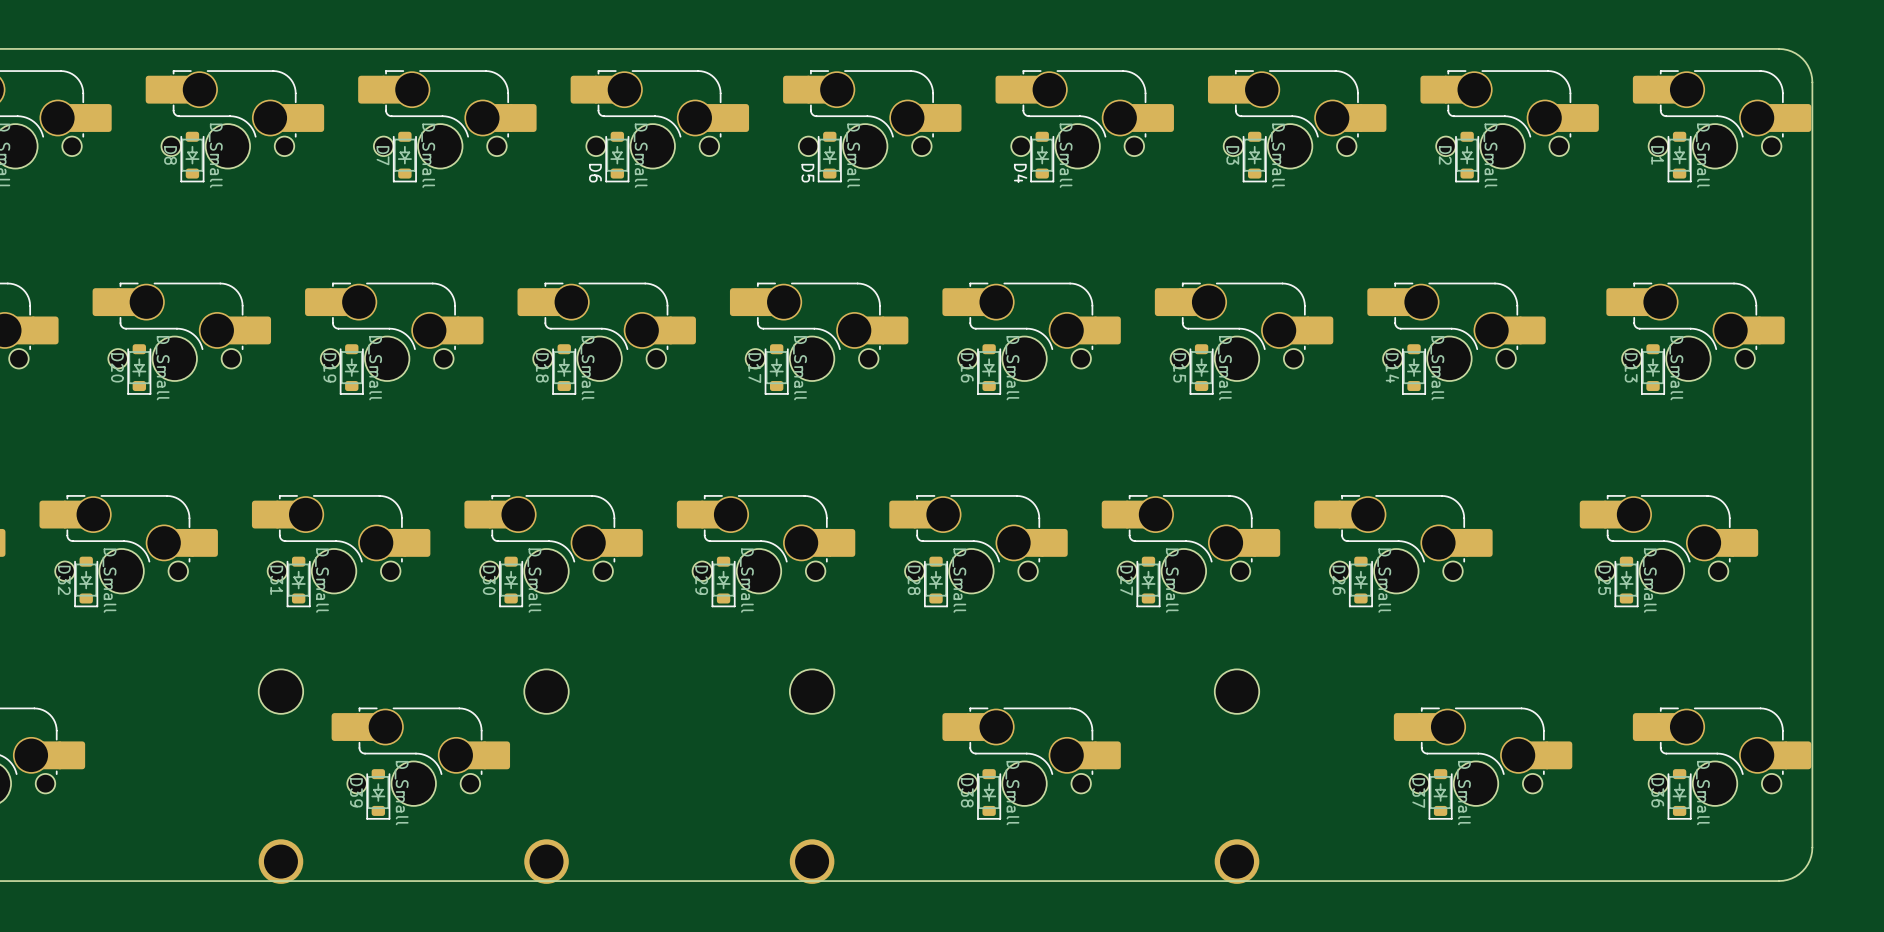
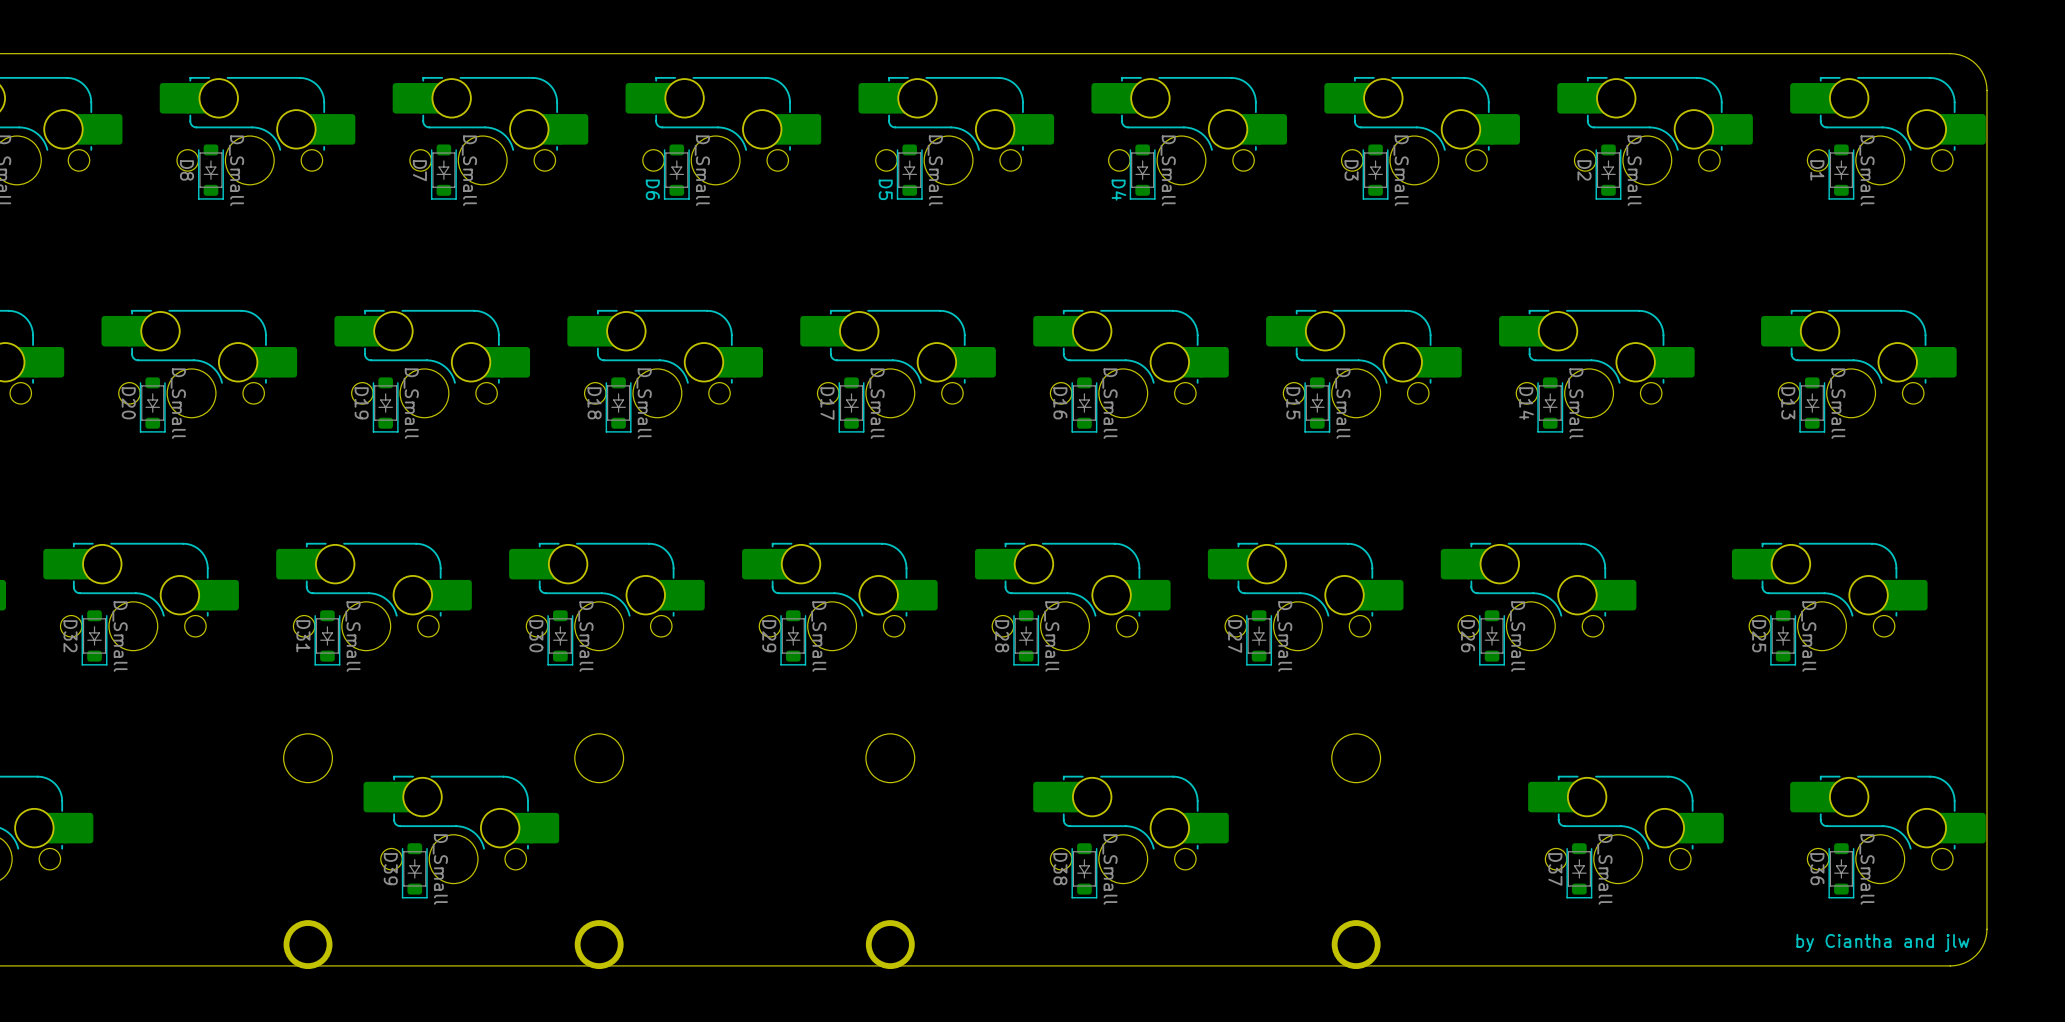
text: none -> by Ciantha and jlw (1882, 943)

